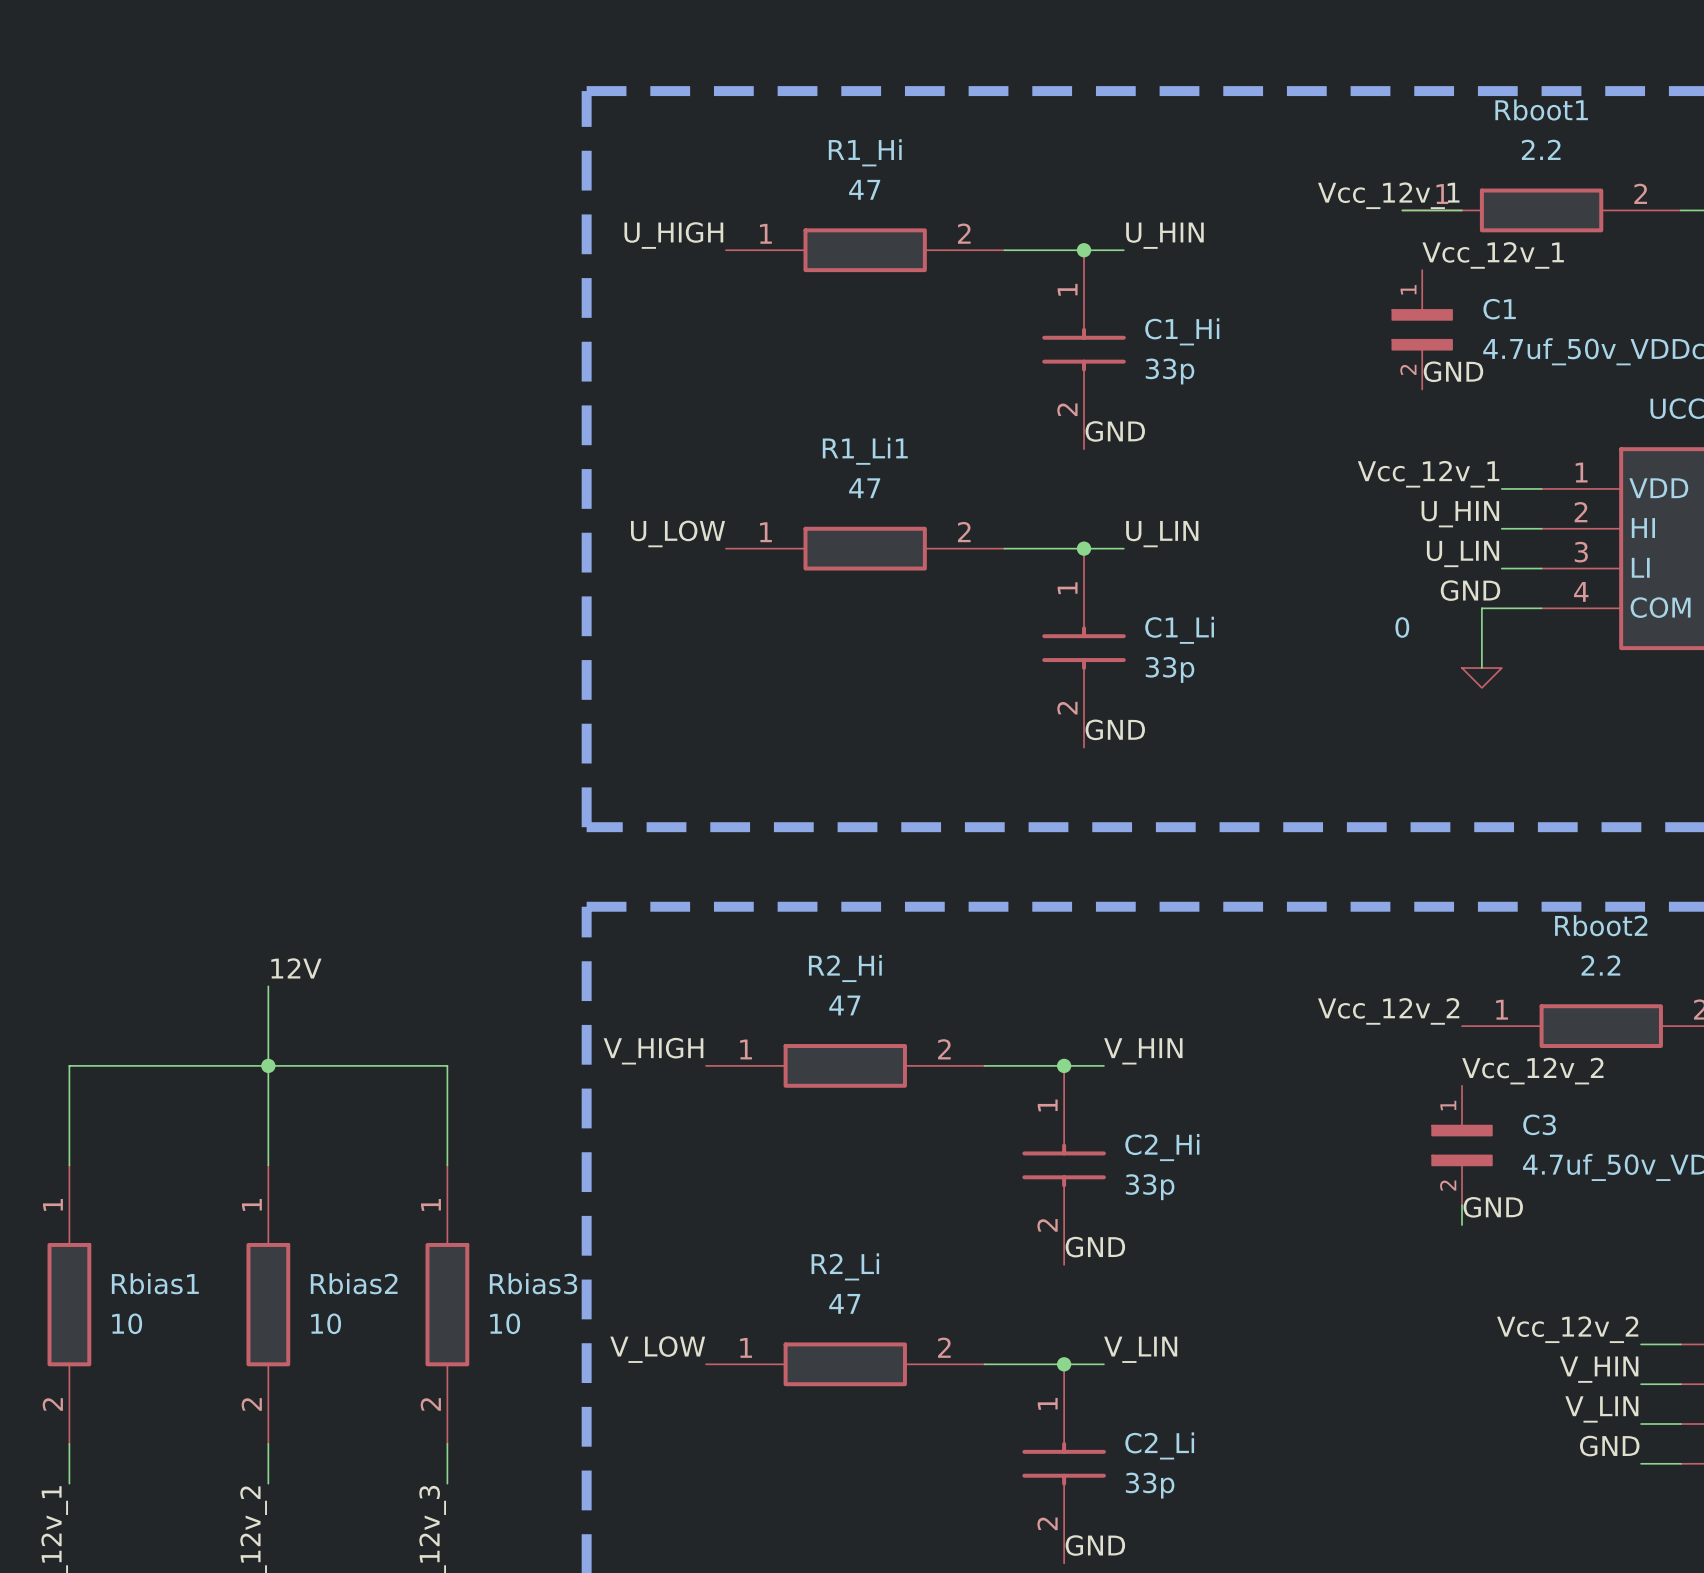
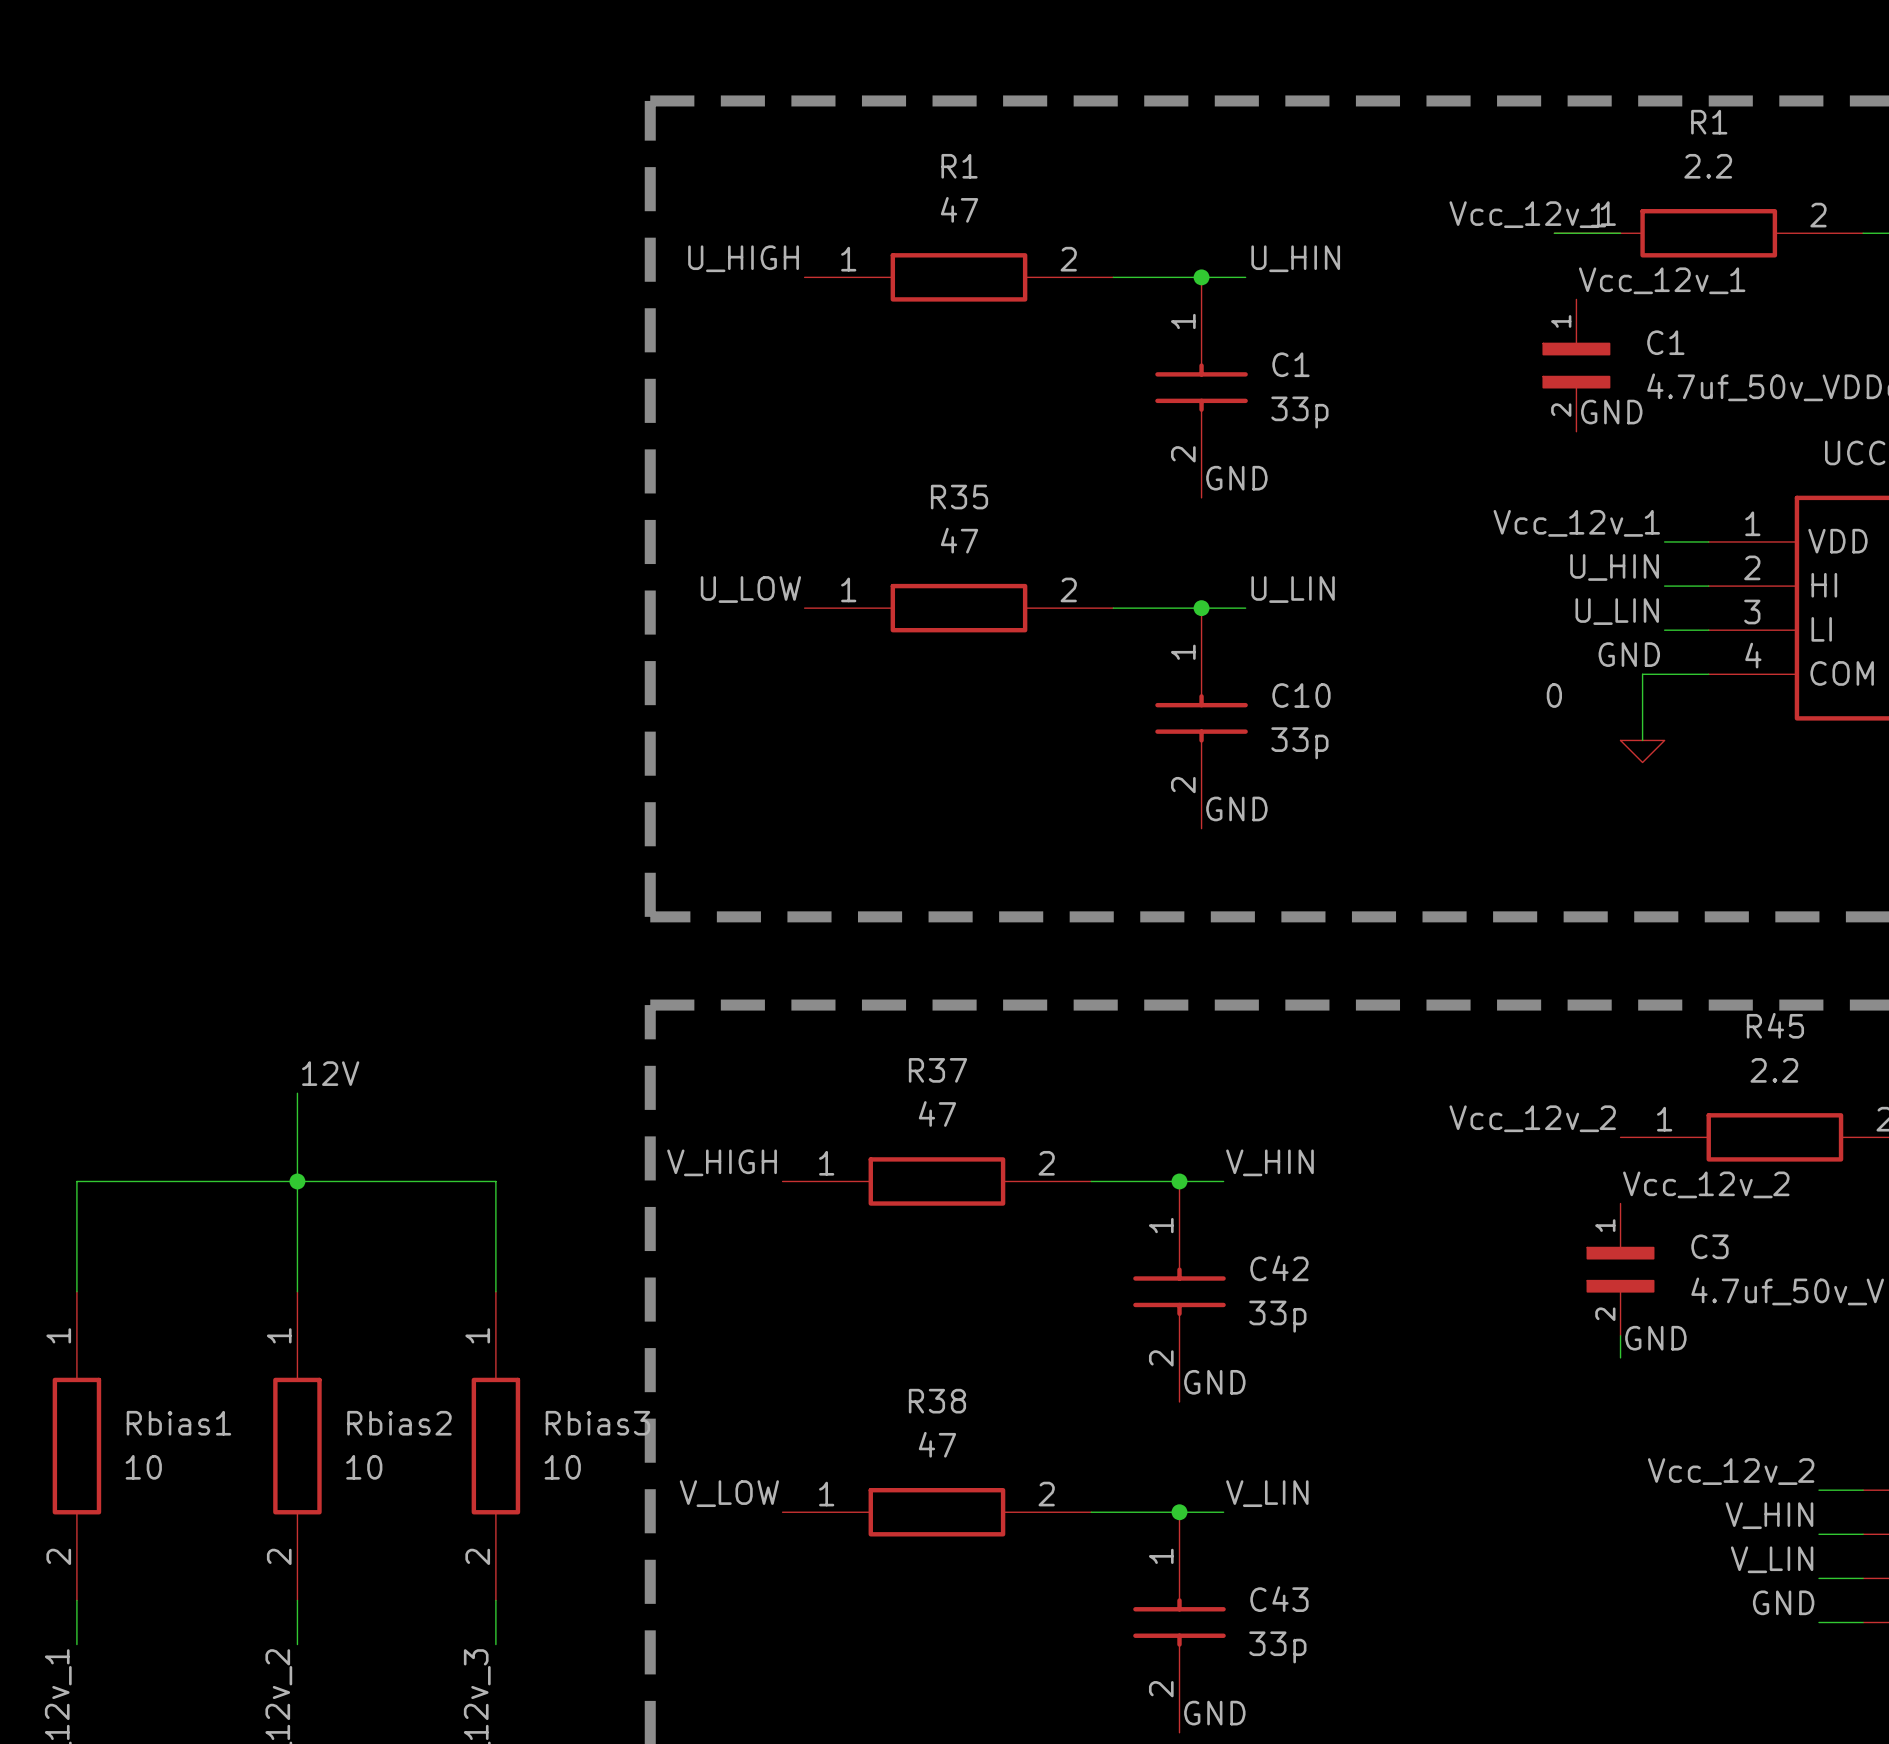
Rboot1 name: Rboot1 (1541, 110) -> R1 (1709, 122)
R1_Hi name: R1_Hi (865, 152) -> R1 (959, 166)
C1_Hi name: C1_Hi (1182, 331) -> C1 (1290, 364)
R1_Li1 name: R1_Li1 (865, 451) -> R35 (959, 497)
C1_Li name: C1_Li (1179, 630) -> C10 (1301, 695)
Rboot2 name: Rboot2 (1601, 925) -> R45 (1775, 1025)
R2_Hi name: R2_Hi (845, 968) -> R37 (937, 1070)
C2_Hi name: C2_Hi (1162, 1147) -> C42 (1279, 1268)
R2_Li name: R2_Li (845, 1266) -> R38 (937, 1401)
C2_Li name: C2_Li (1159, 1445) -> C43 (1279, 1599)

